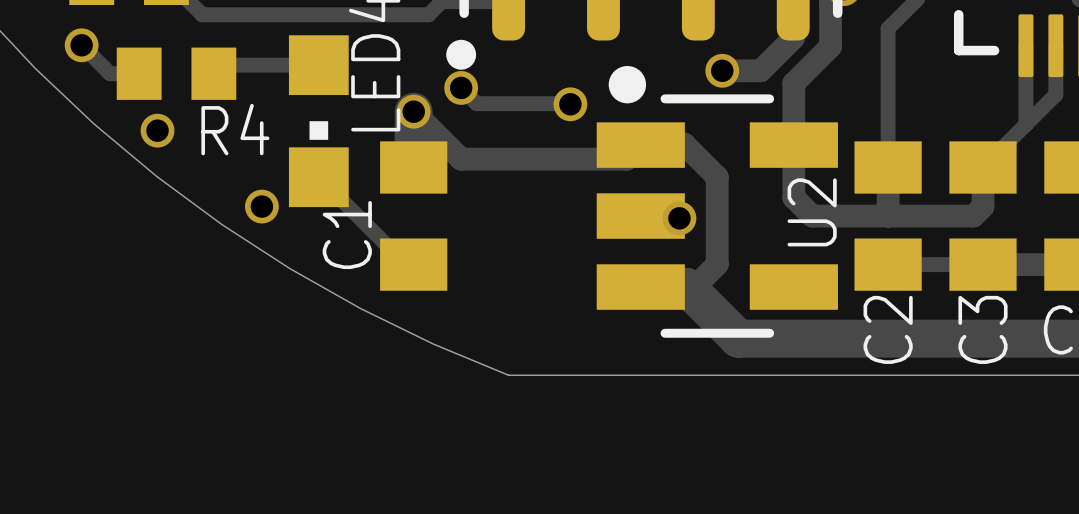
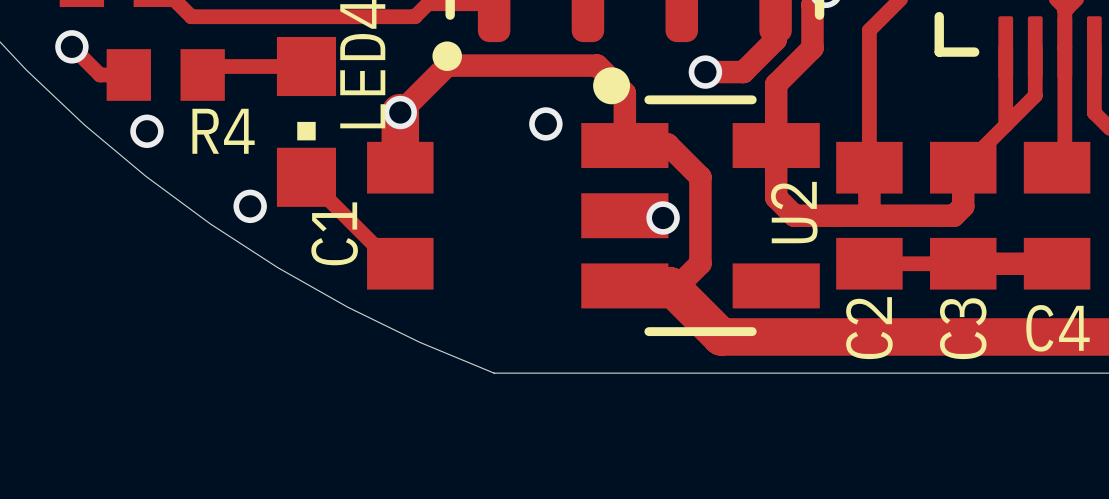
track: (461, 87) (476, 103) (570, 103) -> none
via: (461, 87) -> none
via position: (570, 104) -> (545, 123)
track: (413, 111) (461, 159) (626, 159) (640, 145) -> (400, 112) (447, 65) (597, 65) (624, 93) (624, 145)

